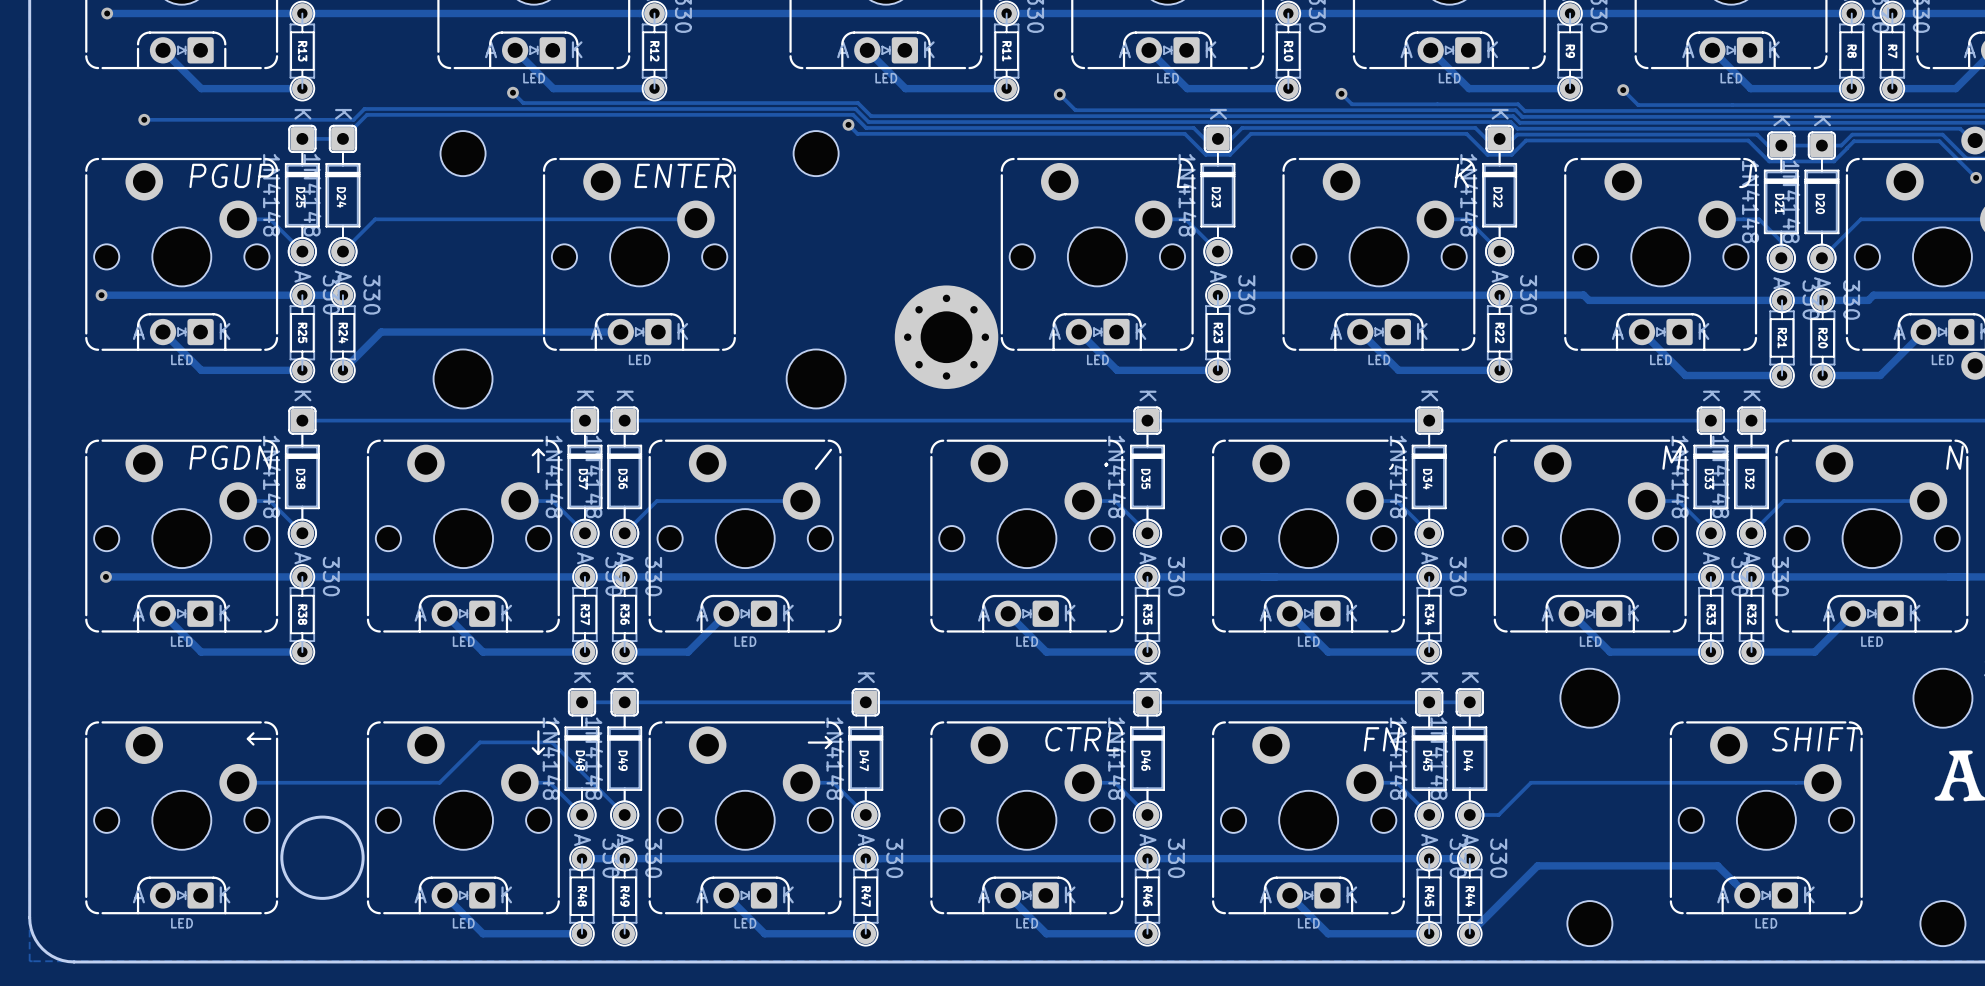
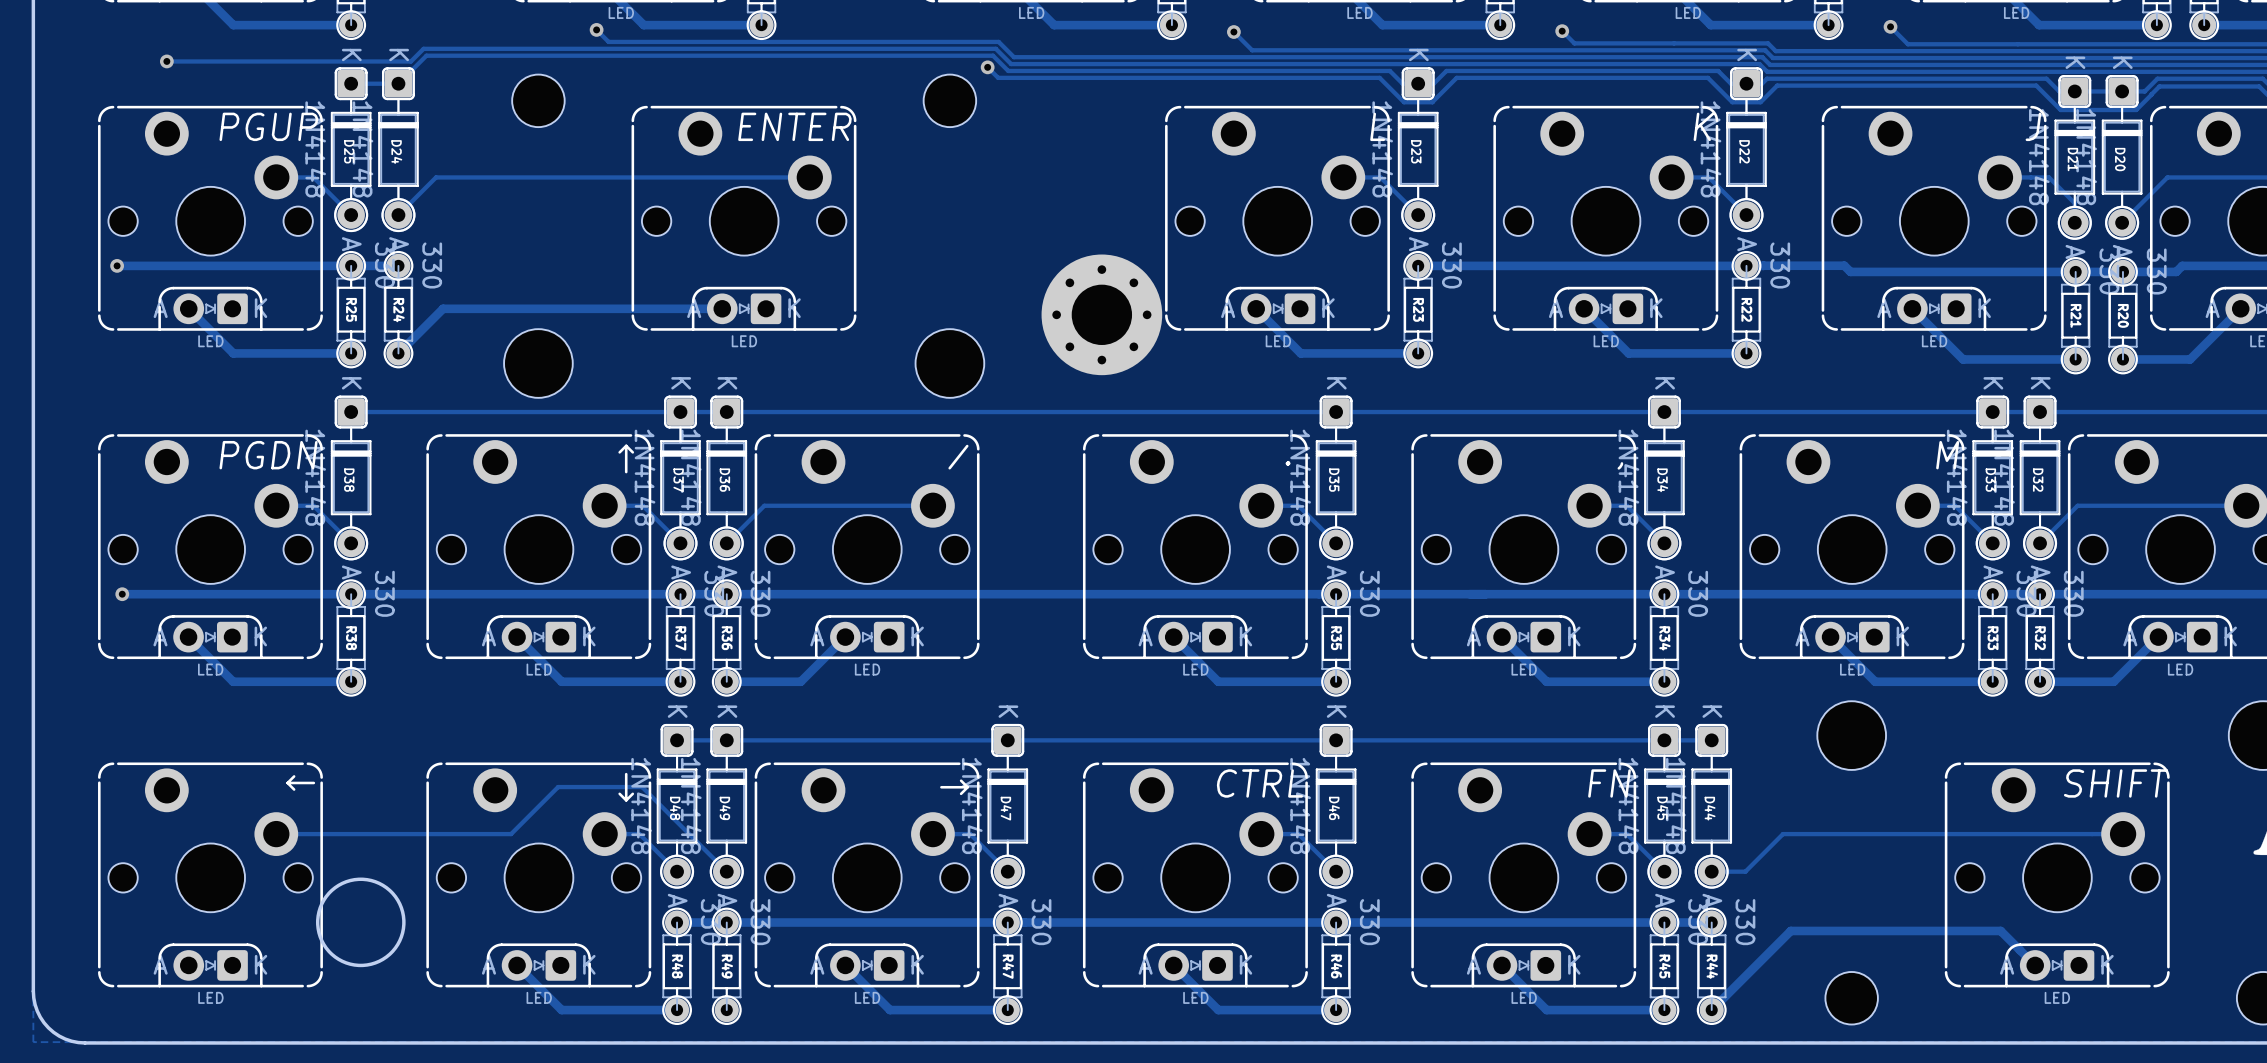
round board edge size: [280, 815, 365, 900] -> [315, 877, 406, 968]

